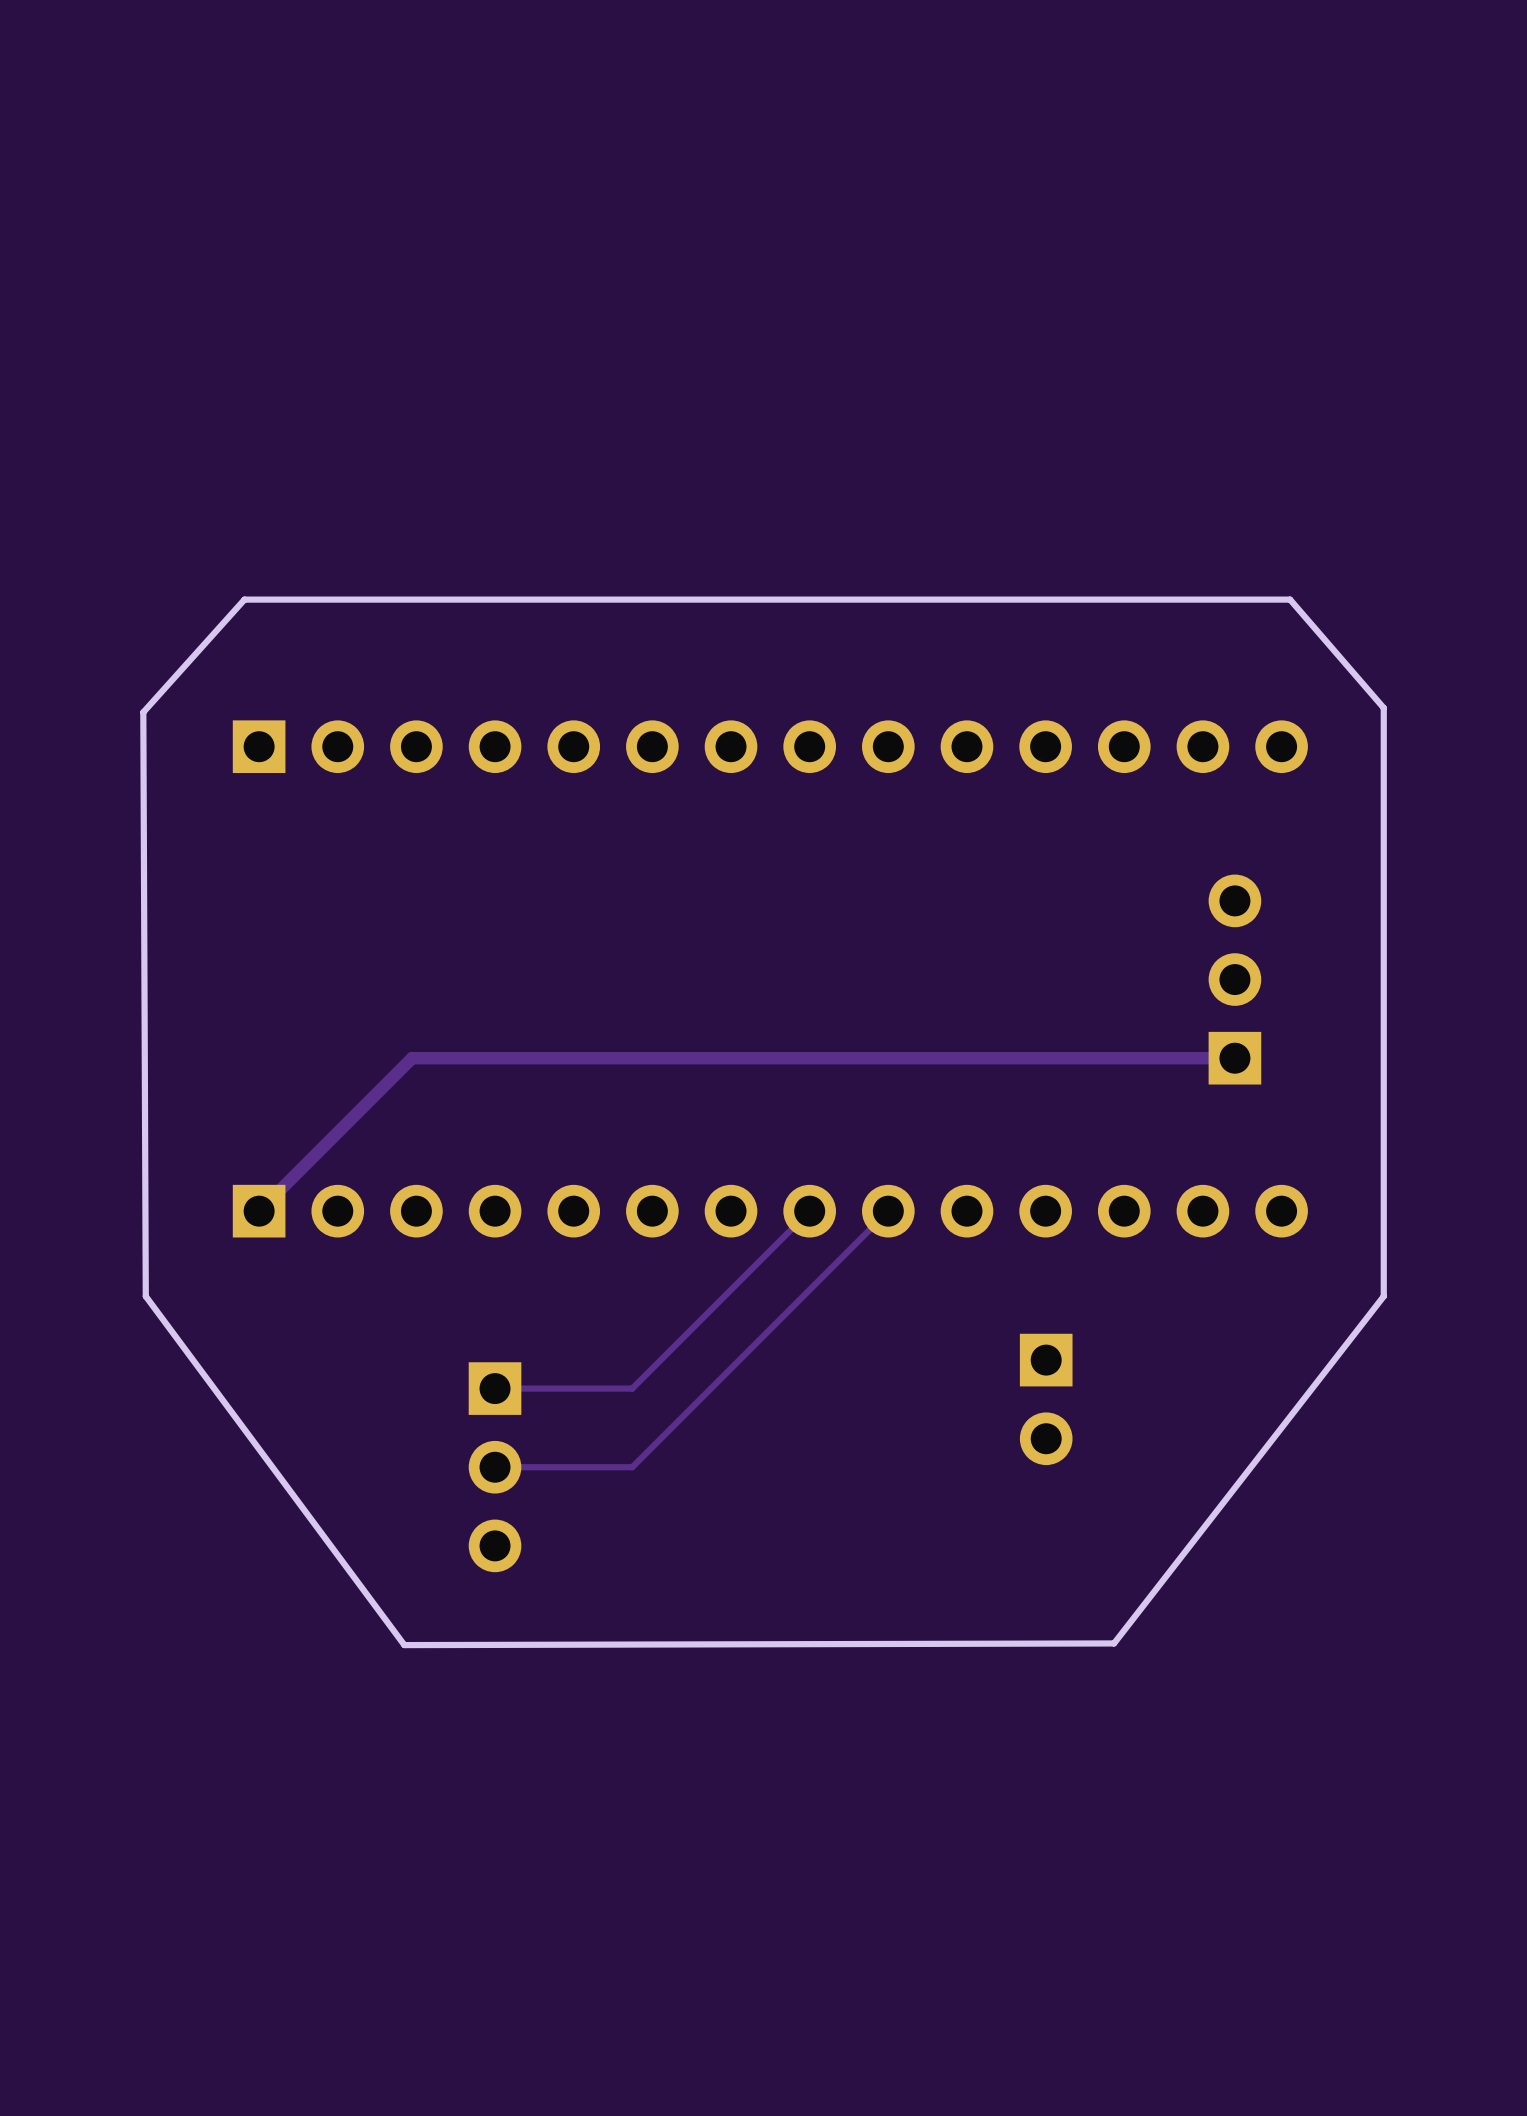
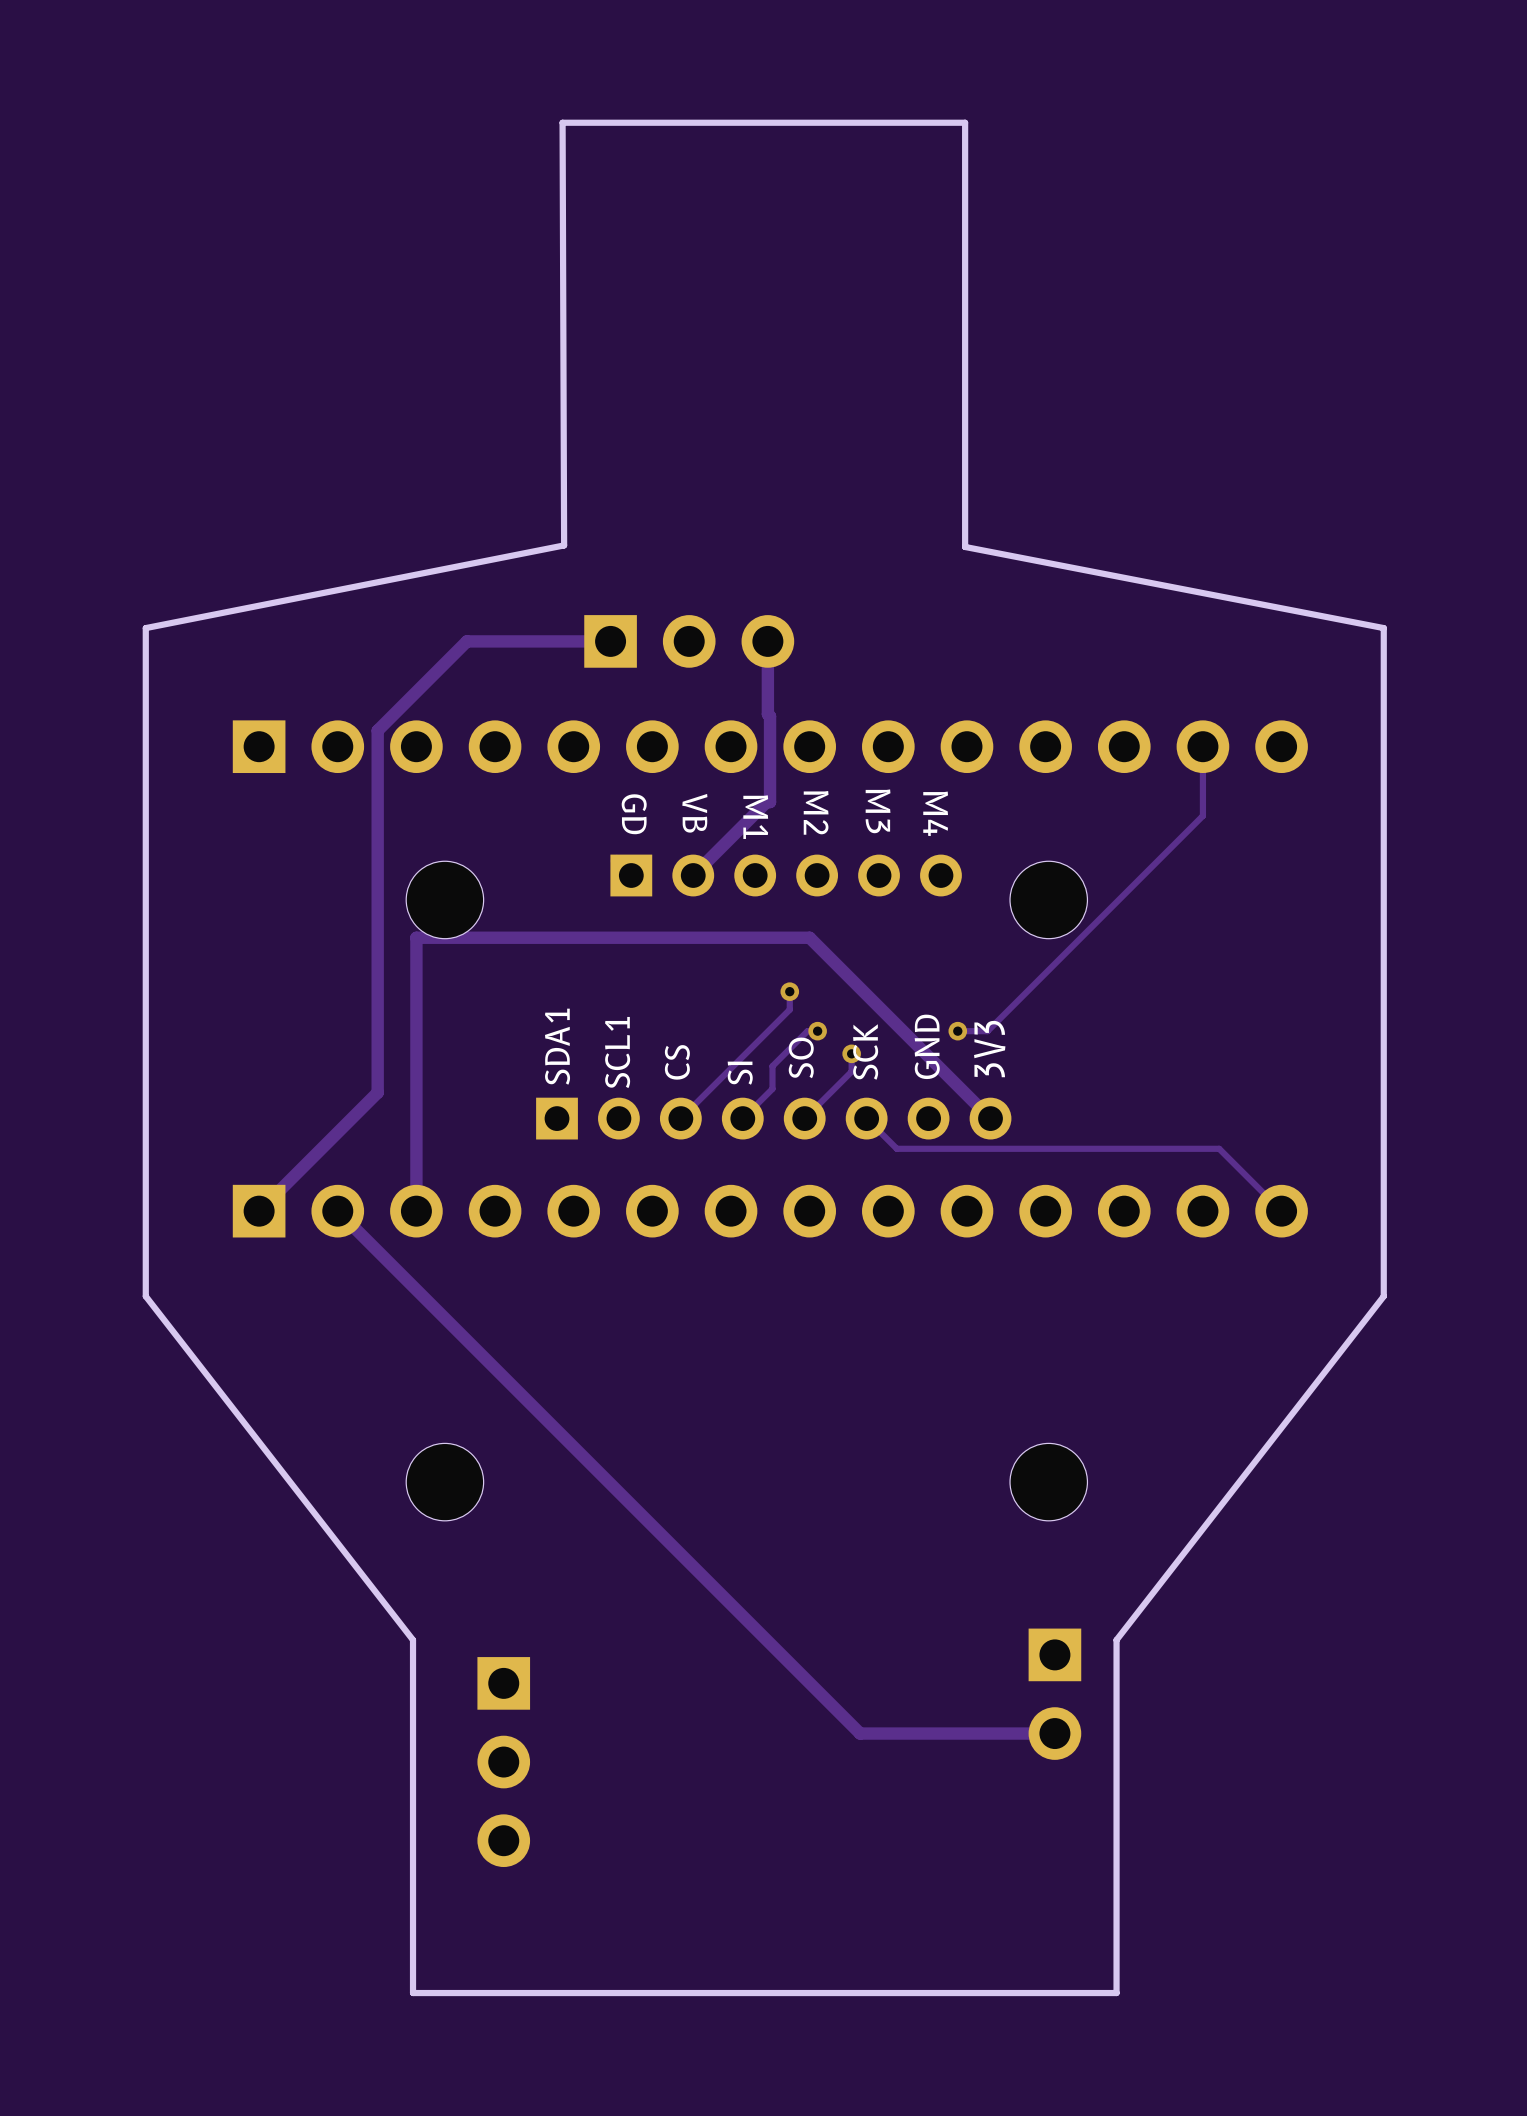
part: none -> (689, 641)
track: none -> (767, 641) (770, 802) (766, 802) (692, 874)
board edge: (1383, 707) (1290, 599) (244, 599) (143, 712) (145, 1296) (404, 1645) (1114, 1643) (1383, 1296) -> (1383, 707) (1383, 628) (965, 546) (965, 122) (562, 122) (564, 545) (145, 628) (145, 1296) (413, 1640) (413, 1993) (1116, 1993) (1116, 1640) (1383, 1296)
track: none -> (1202, 746) (1202, 815) (987, 1031) (957, 1031)
text: none -> M3 (878, 811)
text: none -> M2 (816, 812)
text: none -> VB (694, 813)
text: none -> M4 (935, 813)
text: none -> GD (634, 814)
text: none -> M1 (755, 817)
part: none -> (786, 875)
part: none -> (444, 899)
part: none -> (1048, 899)
part: (1234, 979) -> none
track: none -> (789, 991) (789, 1009) (680, 1118)
via: none -> (789, 991)
track: none -> (817, 1031) (807, 1031) (772, 1066) (772, 1088) (742, 1118)
via: none -> (817, 1031)
via: none -> (957, 1031)
text: none -> SDA1 (557, 1046)
text: none -> GND (927, 1046)
text: none -> 3V3 (989, 1049)
text: none -> SCL1 (617, 1052)
text: none -> SCK (865, 1052)
track: none -> (851, 1053) (851, 1071) (804, 1118)
via: none -> (851, 1053)
text: none -> SO (801, 1057)
track: (1234, 1058) (412, 1058) (377, 1092) -> (610, 641) (466, 641) (377, 730) (377, 1092)
text: none -> CS (677, 1062)
text: none -> SI (740, 1073)
part: none -> (773, 1118)
track: none -> (866, 1118) (896, 1148) (1219, 1148) (1281, 1211)
track: none -> (990, 1118) (809, 937) (416, 937) (416, 1211)
track: none -> (337, 1211) (860, 1733) (1054, 1733)
track: (809, 1211) (632, 1388) (495, 1388) -> none
track: (888, 1211) (632, 1467) (495, 1467) -> none
part position: (1046, 1399) -> (1054, 1694)
part position: (495, 1467) -> (503, 1762)
part: none -> (444, 1482)
part: none -> (1048, 1482)

